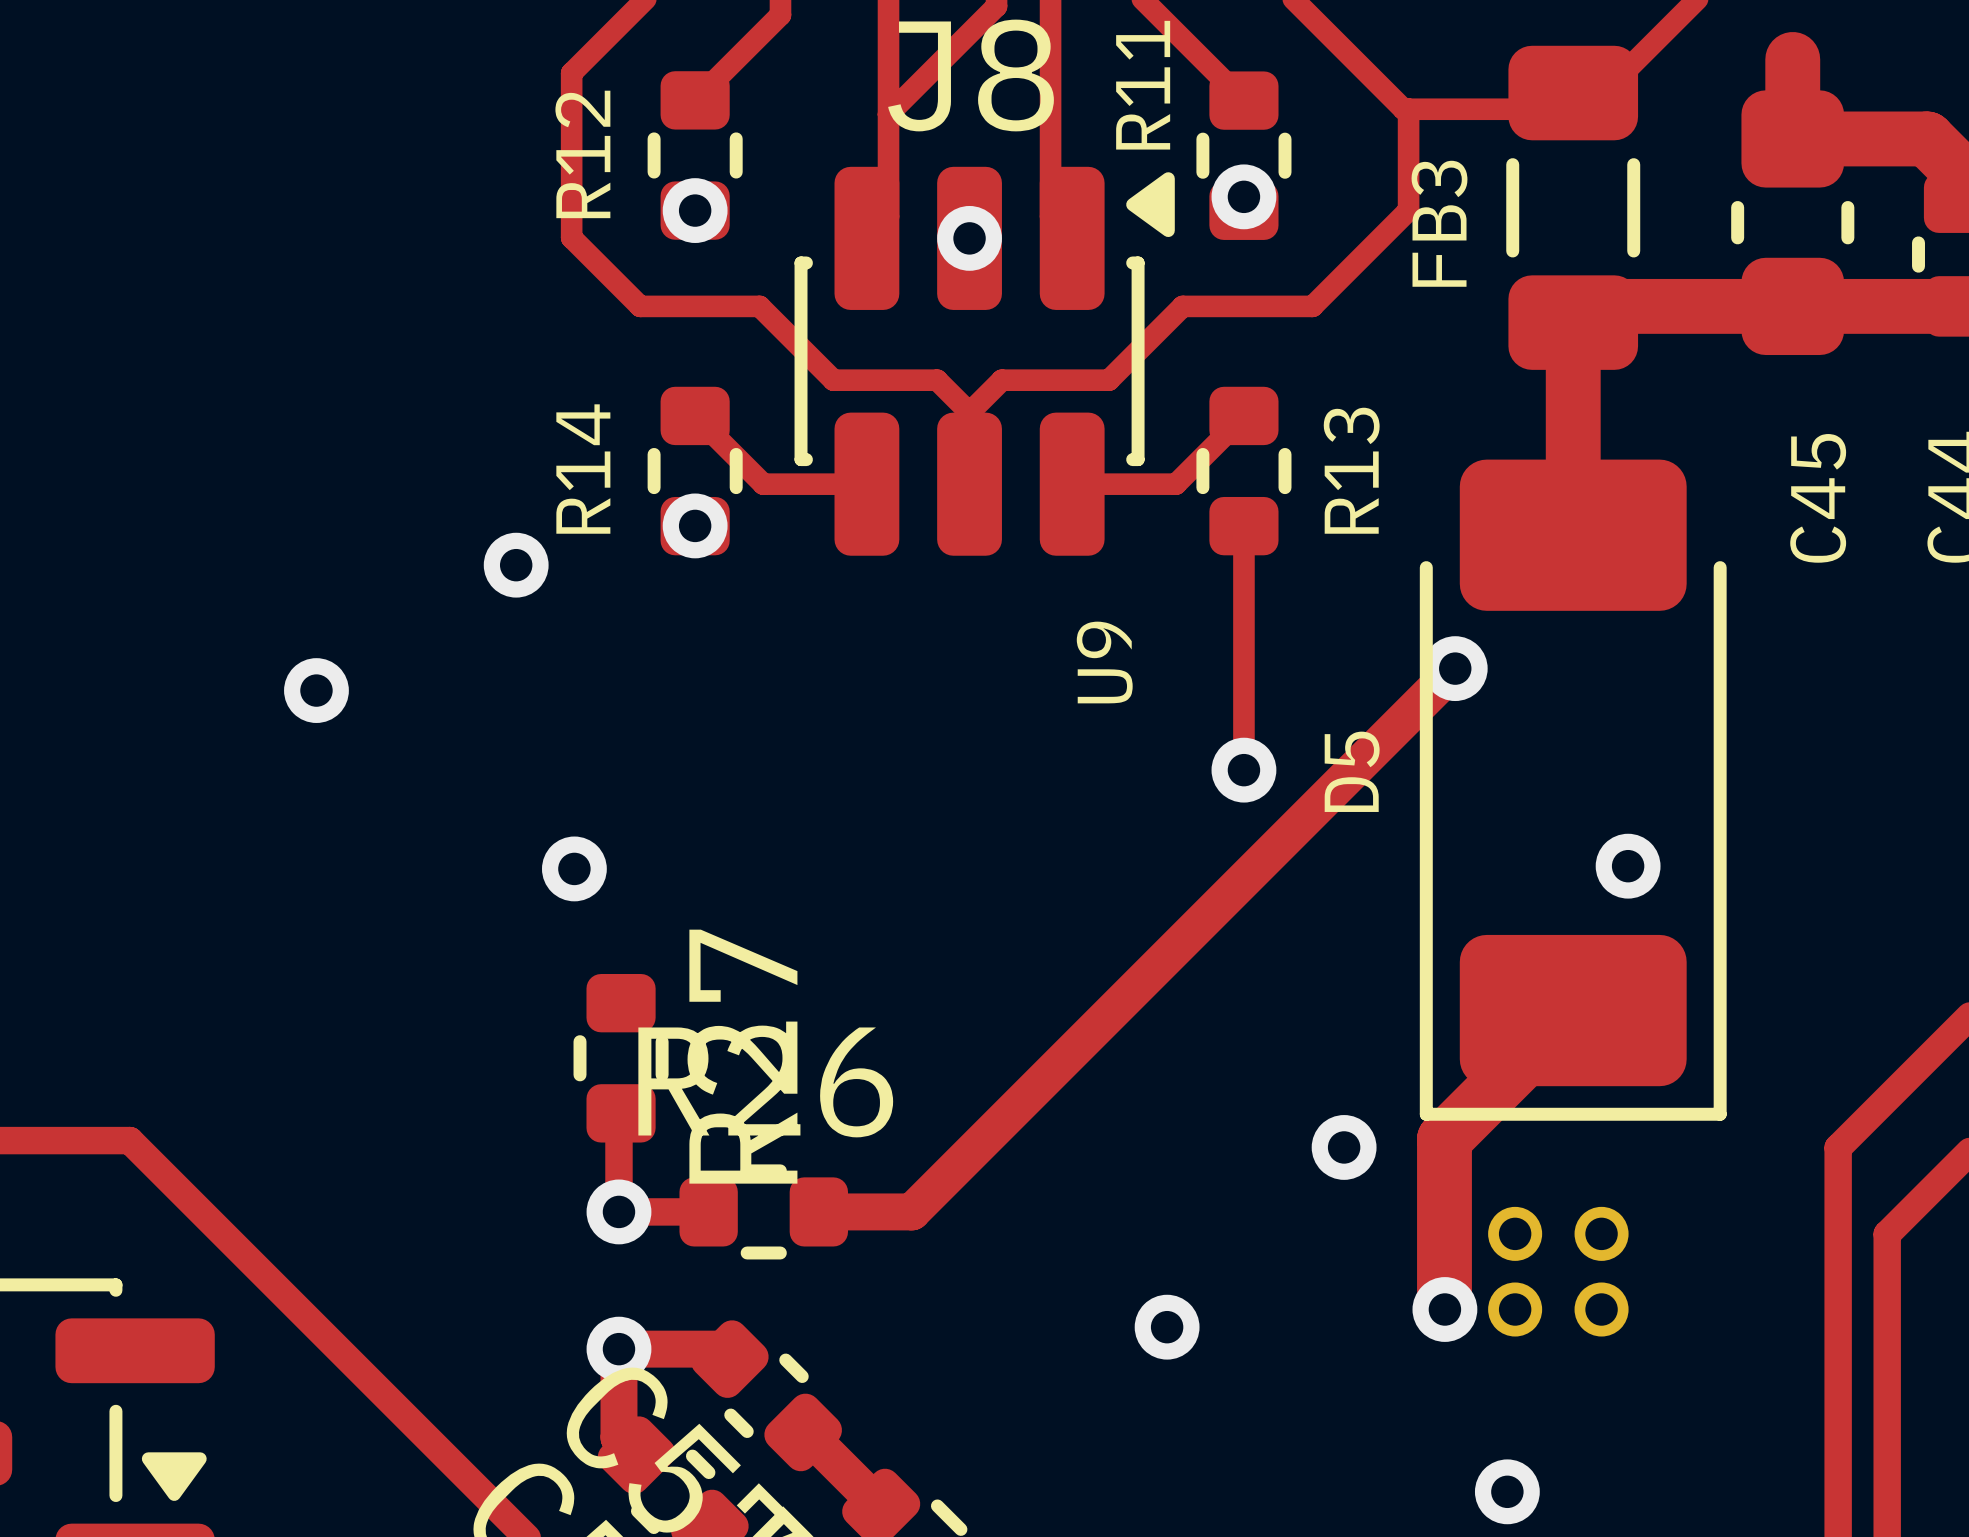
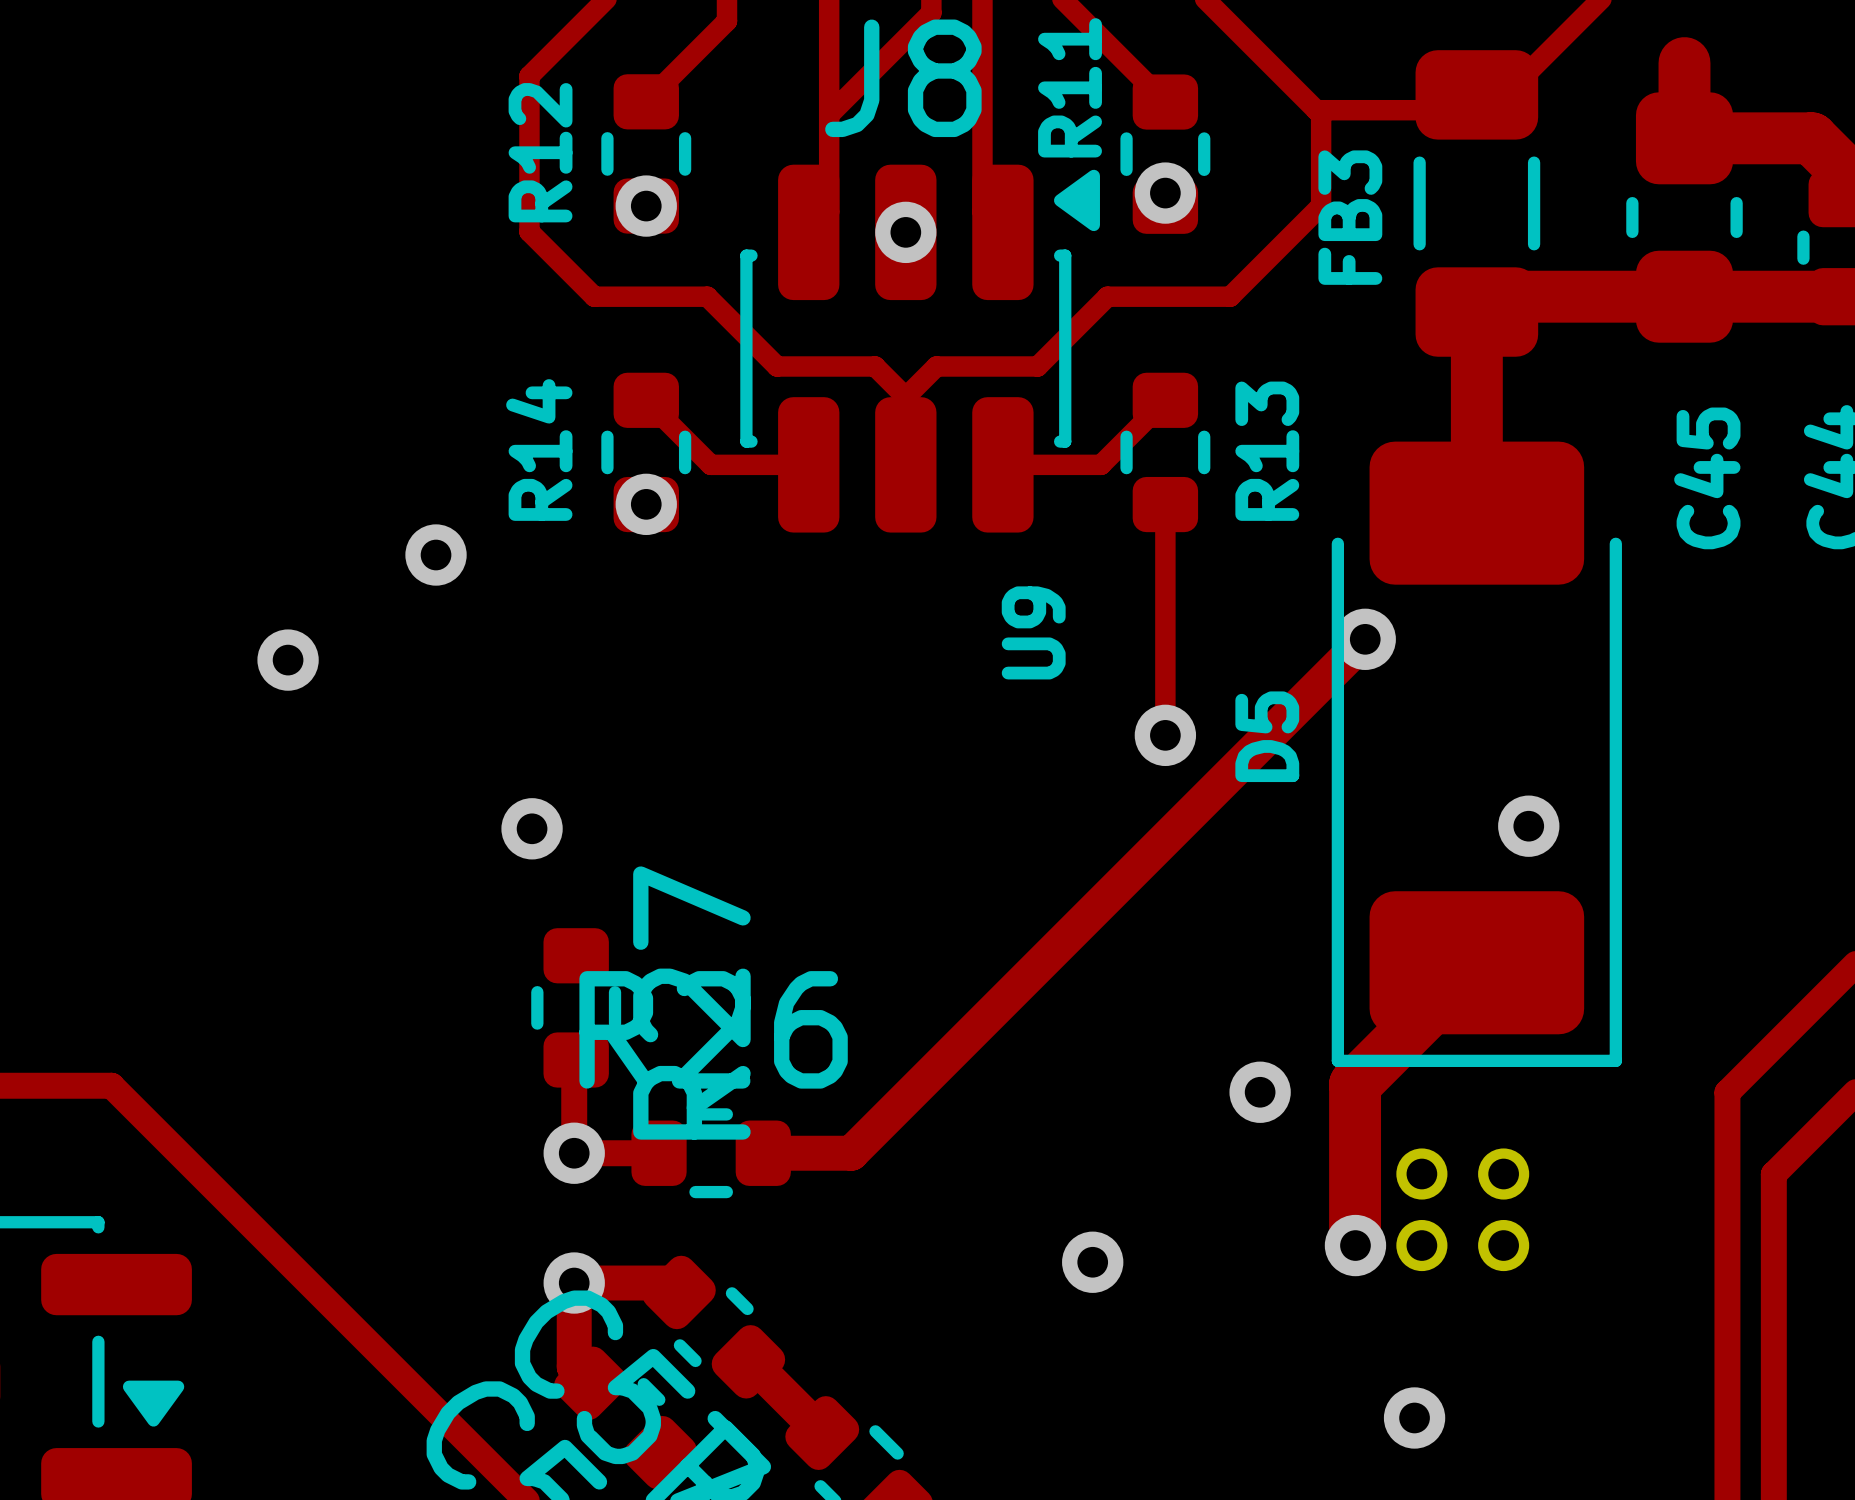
via position: (516, 565) -> (436, 555)

